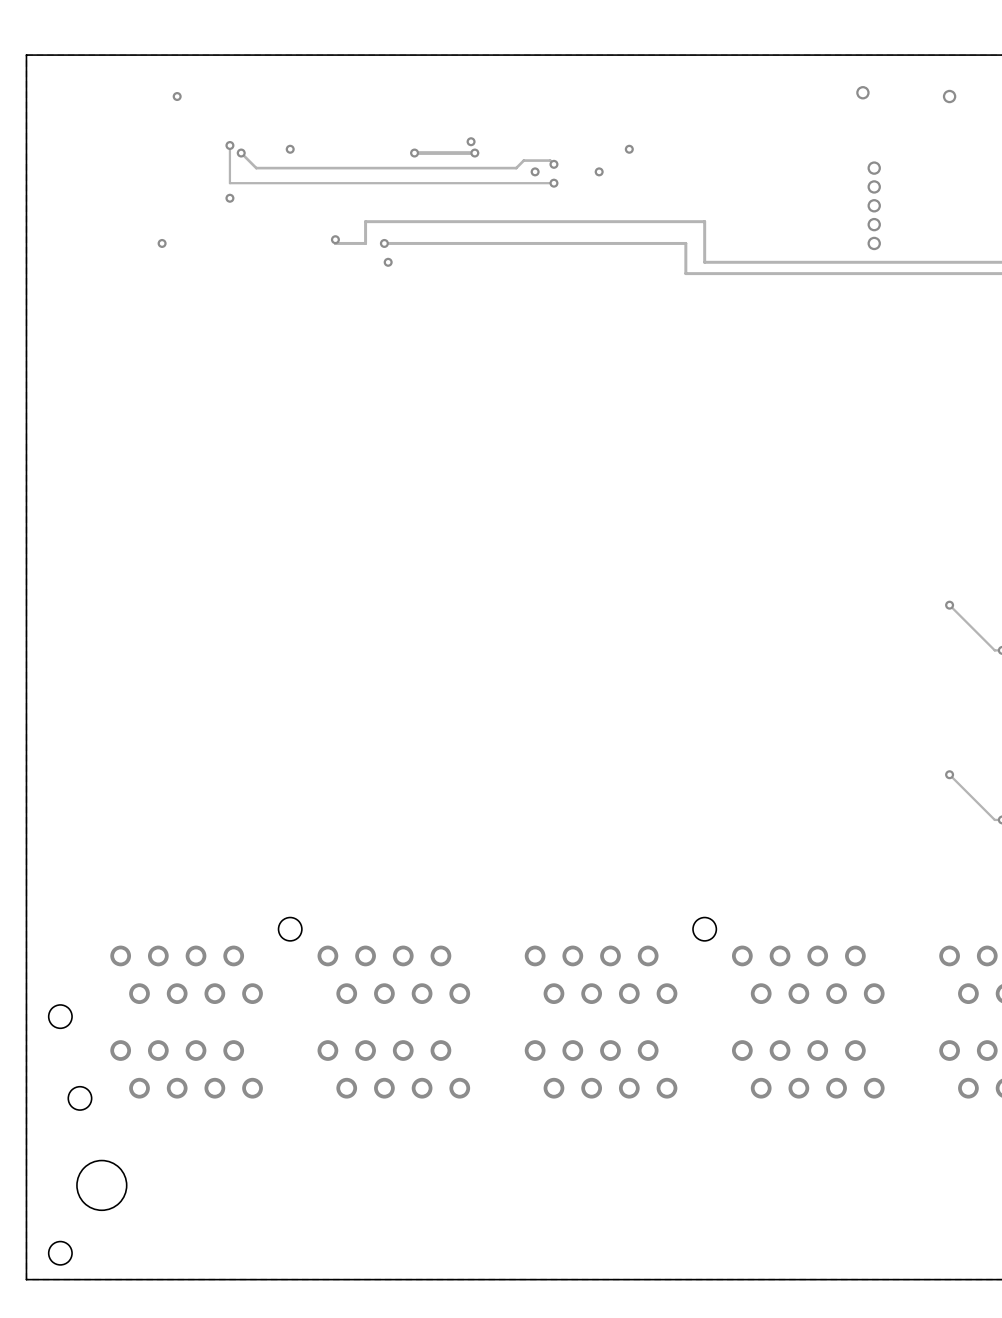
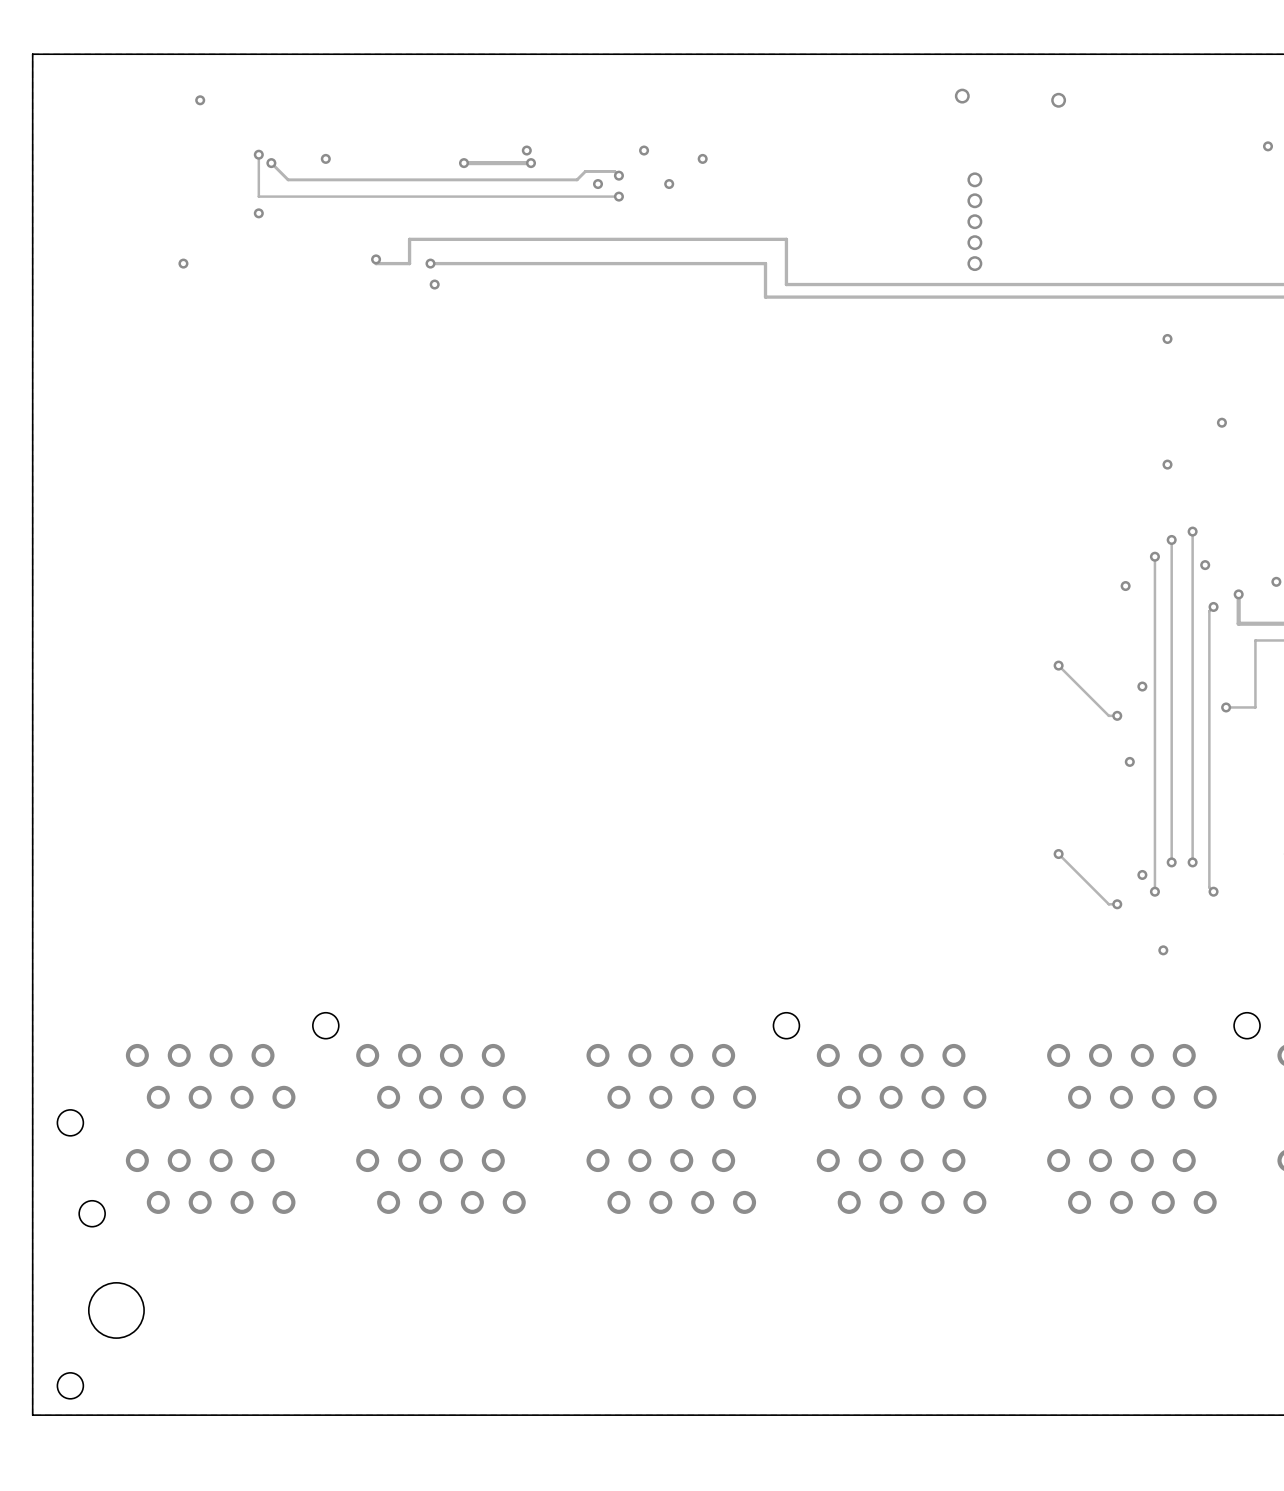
via: none -> (644, 150)

